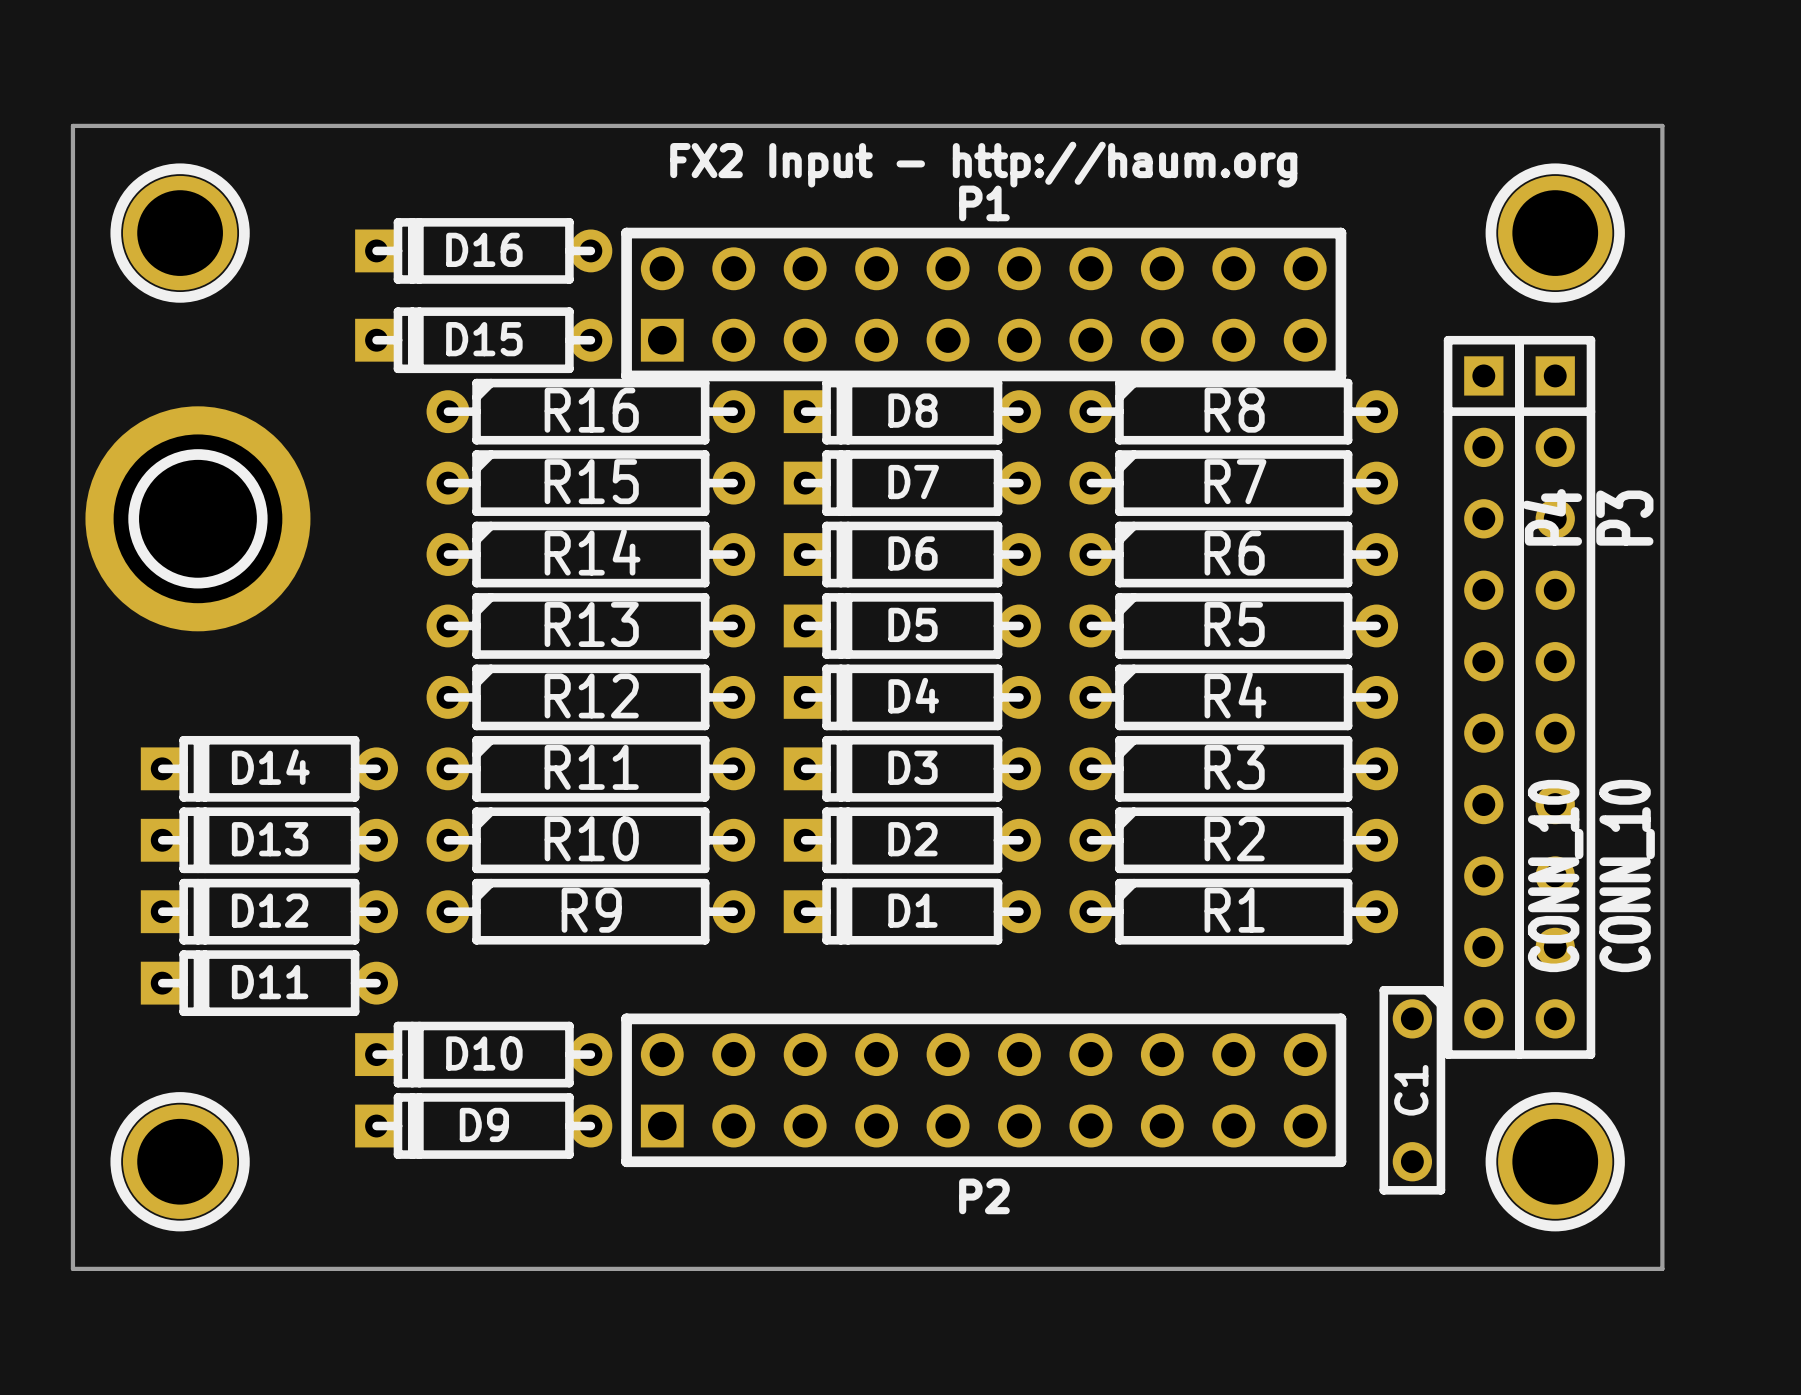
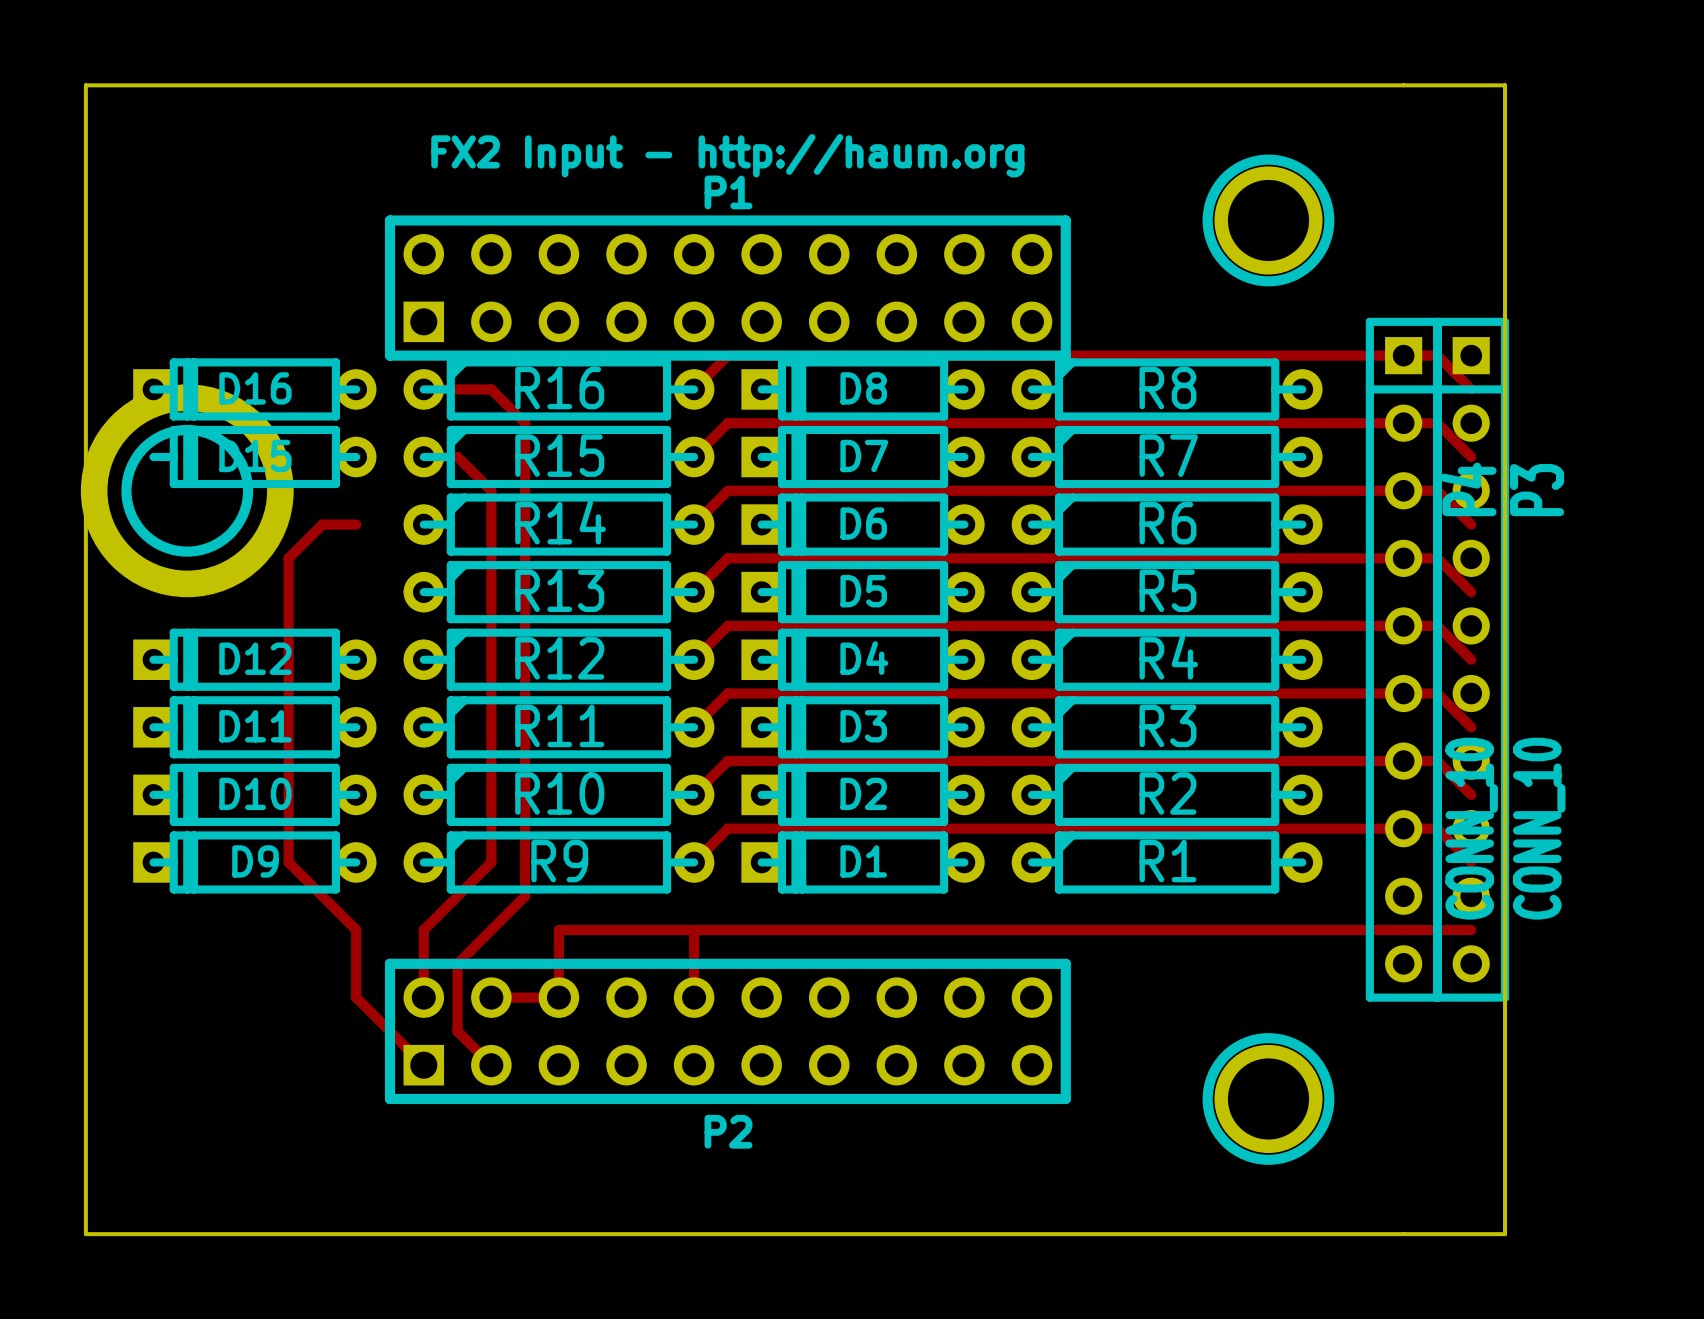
board edge: (72, 125) (72, 1268) (1662, 1268) (1662, 125) (72, 125) -> (85, 85) (85, 1234) (1505, 1234) (1505, 85) (85, 85)
text position: FX2 Input - http://haum.org (983, 164) -> FX2 Input - http://haum.org (727, 155)
part: (180, 233) -> none
part position: (1555, 233) -> (1268, 220)
D16 position: (483, 250) -> (254, 389)
P1 position: (983, 304) -> (727, 288)
D15 position: (483, 340) -> (254, 457)
track: none -> (423, 389) (491, 389) (525, 423) (525, 896) (457, 963) (457, 1031) (491, 1065)
track: none -> (694, 389) (727, 355) (1437, 355) (1471, 389)
track: none -> (423, 457) (457, 457) (491, 490) (491, 862) (423, 930) (423, 997)
track: none -> (694, 457) (727, 423) (1437, 423) (1471, 457)
track: none -> (356, 524) (322, 524) (288, 558) (288, 862) (356, 930) (356, 997) (423, 1065)
track: none -> (694, 524) (727, 490) (1437, 490) (1471, 524)
track: none -> (694, 592) (727, 558) (1437, 558) (1471, 592)
D12: none -> (254, 659)
track: none -> (694, 659) (727, 625) (1437, 625) (1471, 659)
D14 name: D14 (270, 767) -> D11 (255, 726)
track: none -> (694, 727) (727, 693) (1437, 693) (1471, 727)
D13 name: D13 (270, 839) -> D10 (255, 793)
track: none -> (694, 794) (727, 761) (1437, 761) (1471, 794)
D12 name: D12 (270, 910) -> D9 (255, 861)
track: none -> (694, 862) (727, 828) (1437, 828) (1471, 862)
D11: (269, 983) -> none
track: none -> (694, 930) (694, 997)
track: none -> (1471, 930) (558, 930) (558, 997) (491, 997)
D10: (483, 1054) -> none
P2 position: (983, 1090) -> (727, 1031)
C1: (1412, 1090) -> none
D9: (483, 1126) -> none
part: (180, 1161) -> none
part position: (1555, 1161) -> (1268, 1098)

